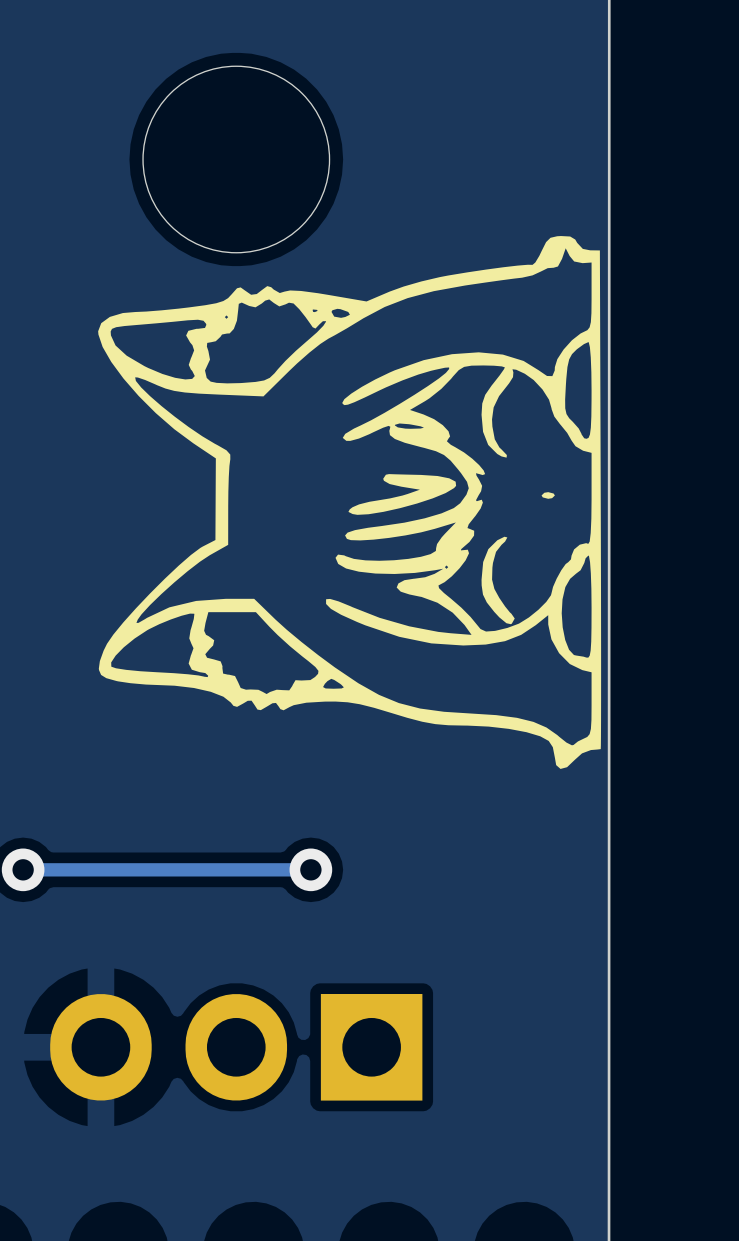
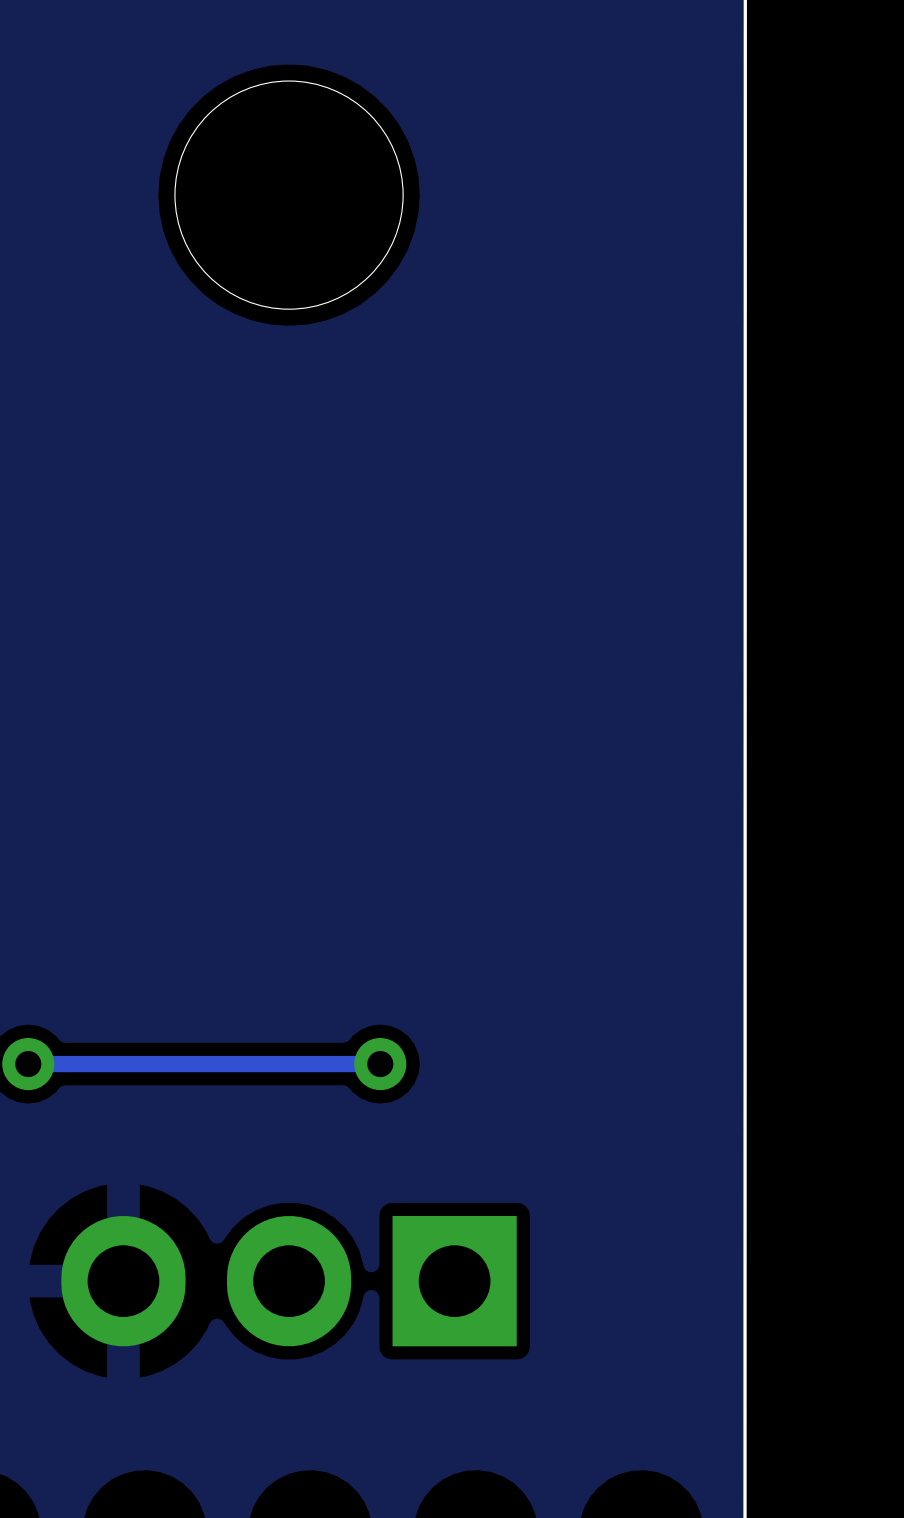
drawing: [98, 236, 602, 769] -> none

